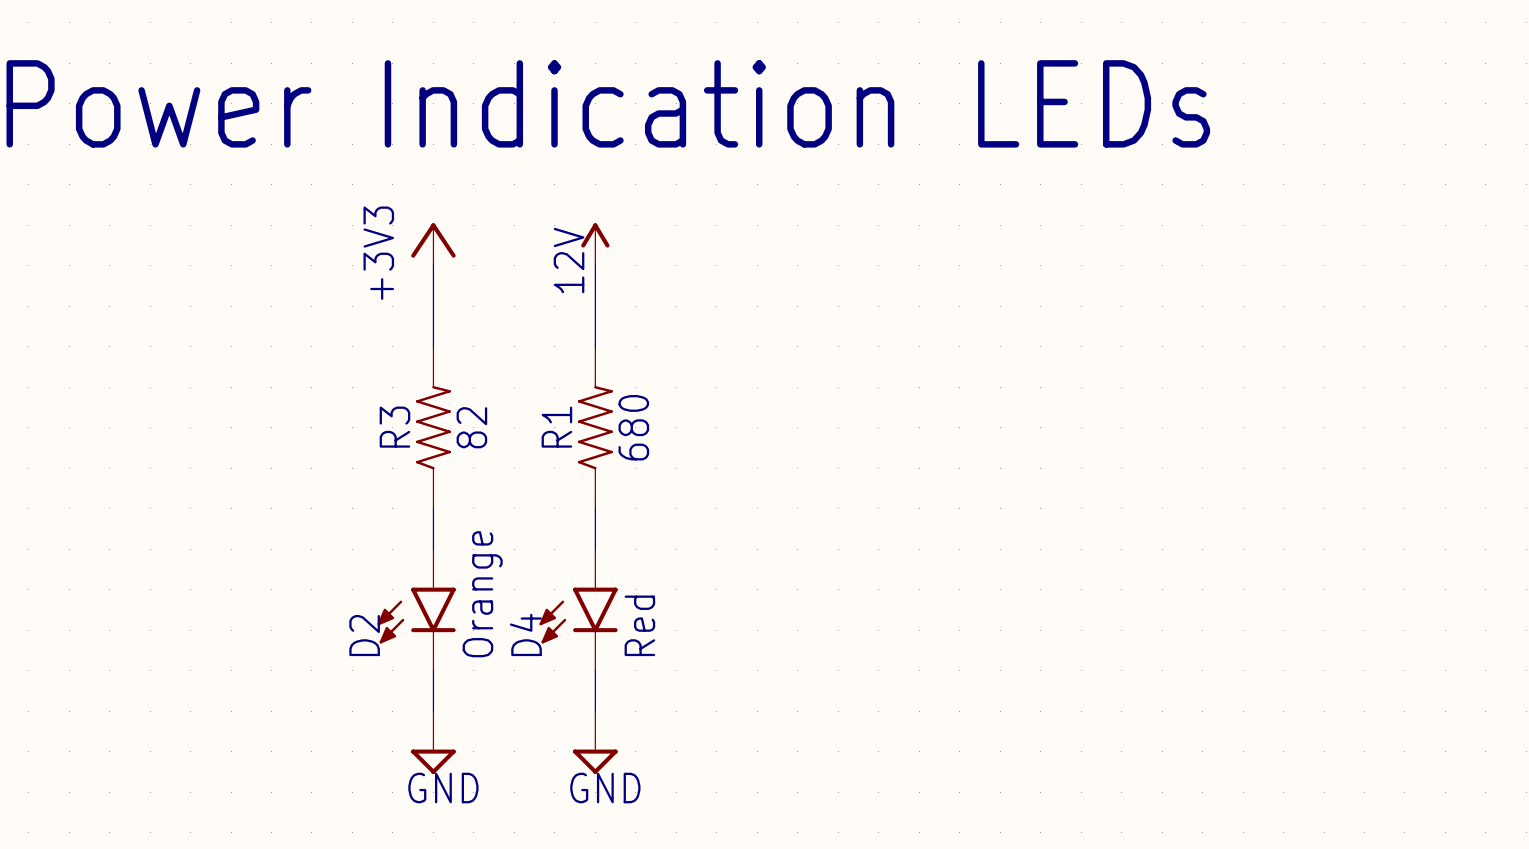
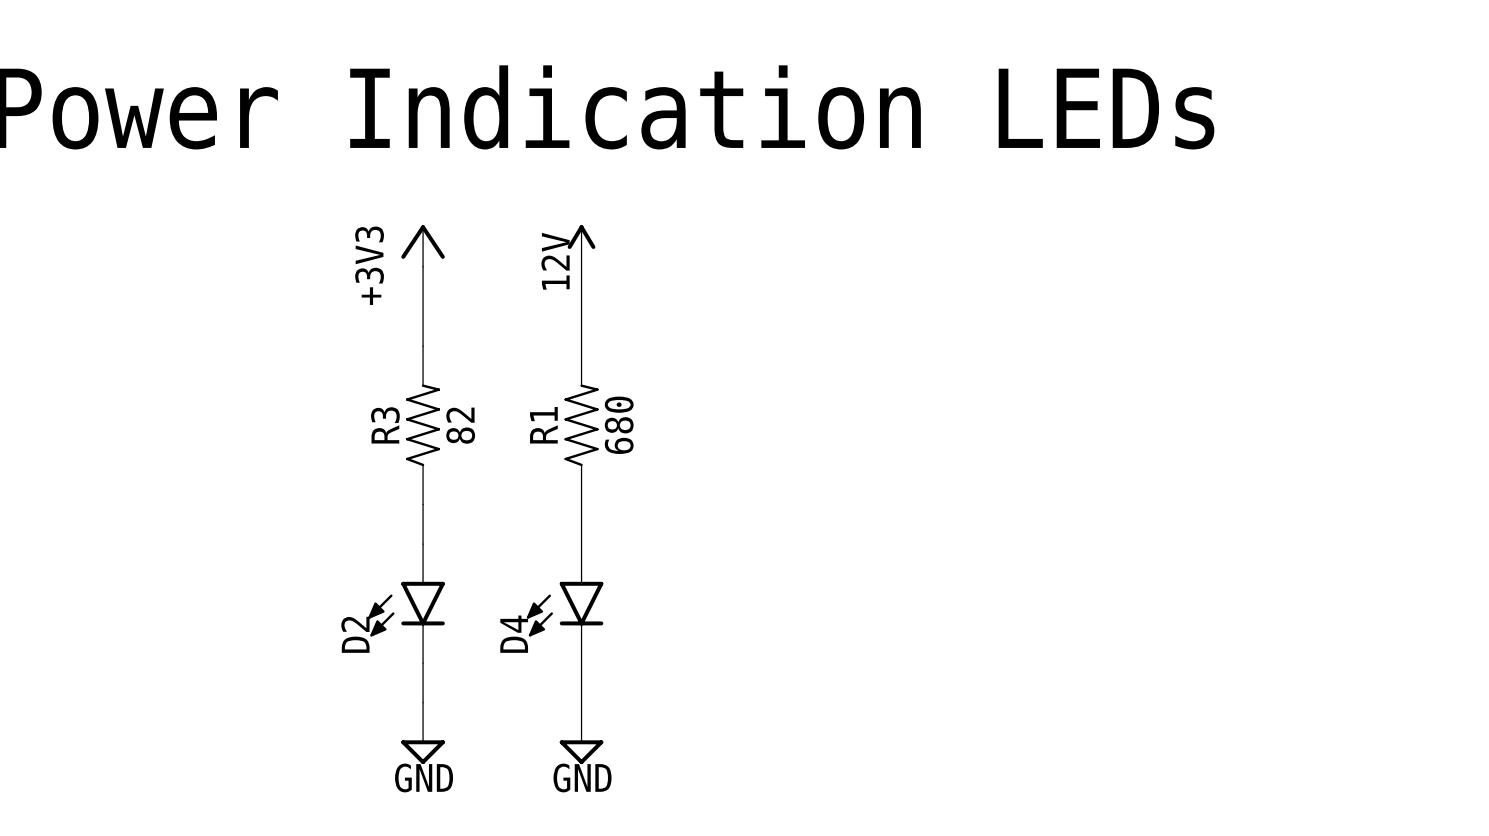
D2 value: Orange (482, 594) -> none
D4 value: Red (639, 625) -> none

